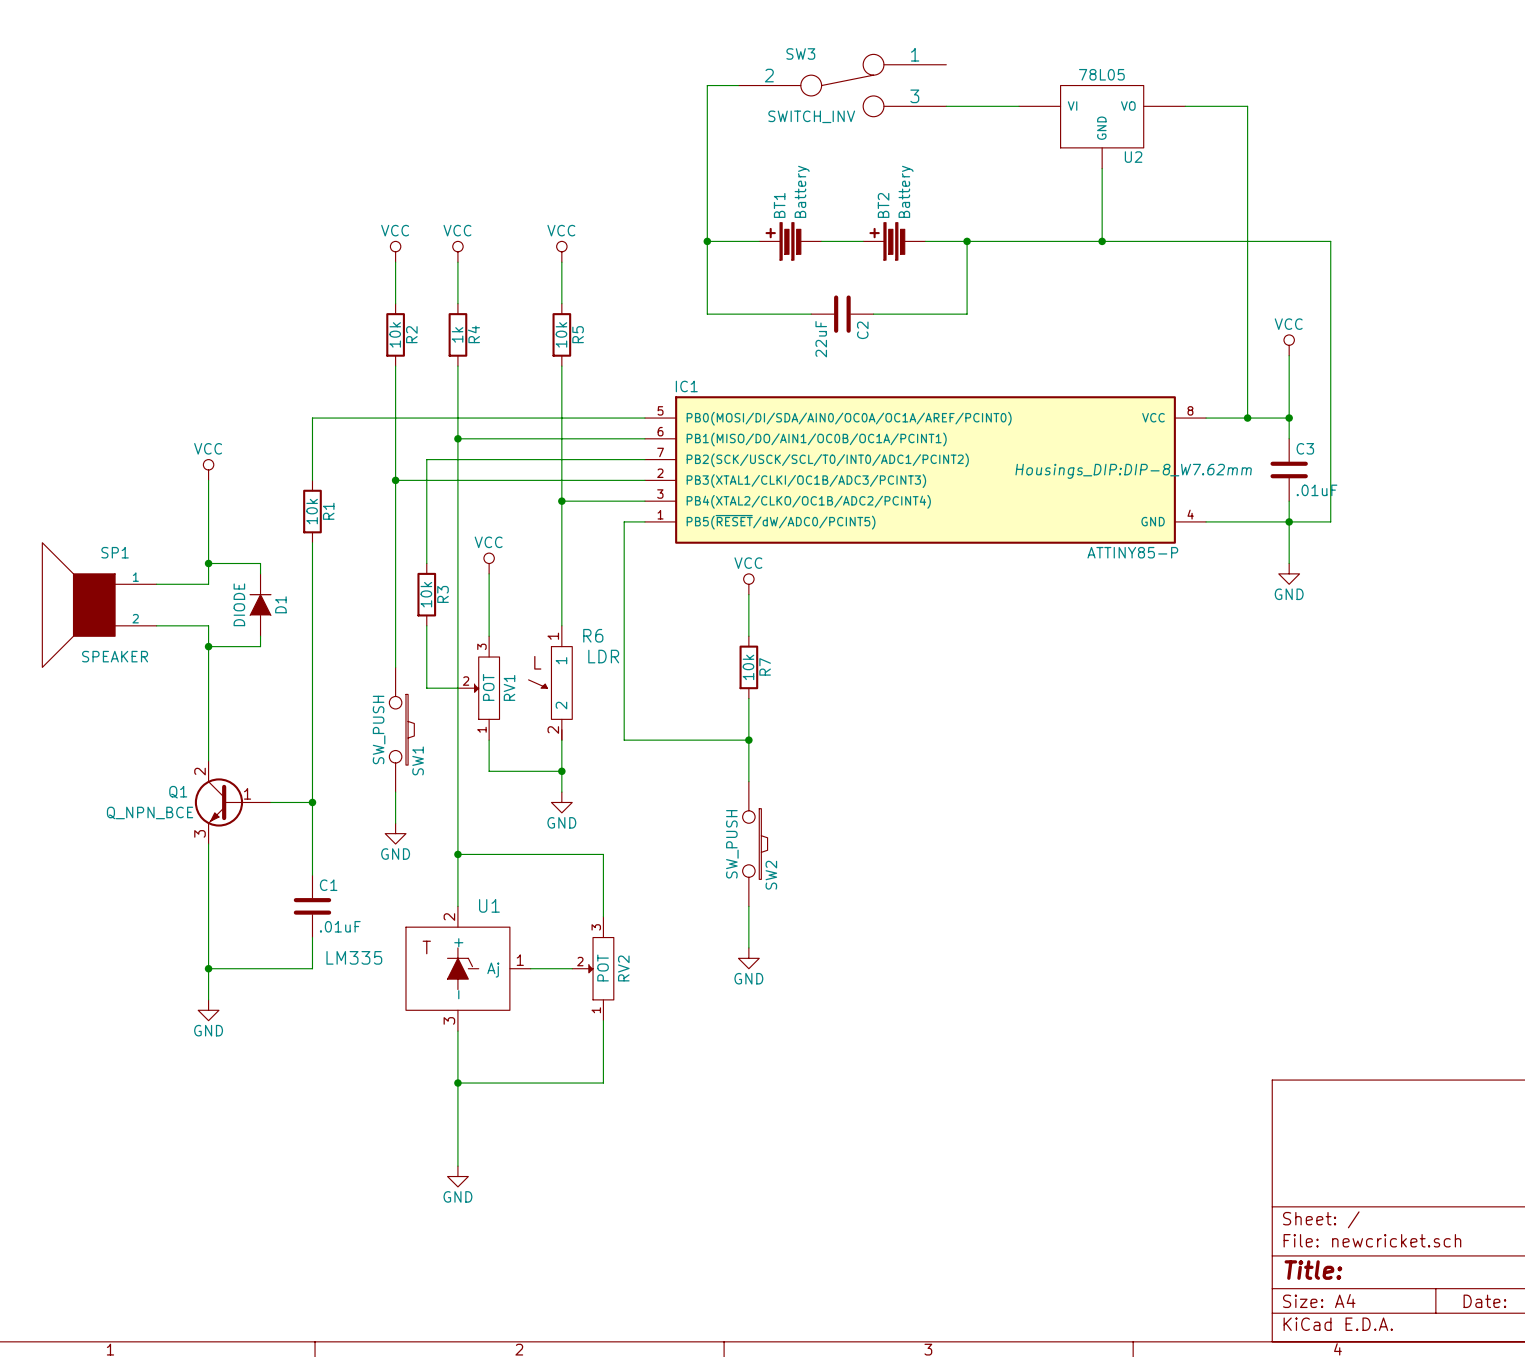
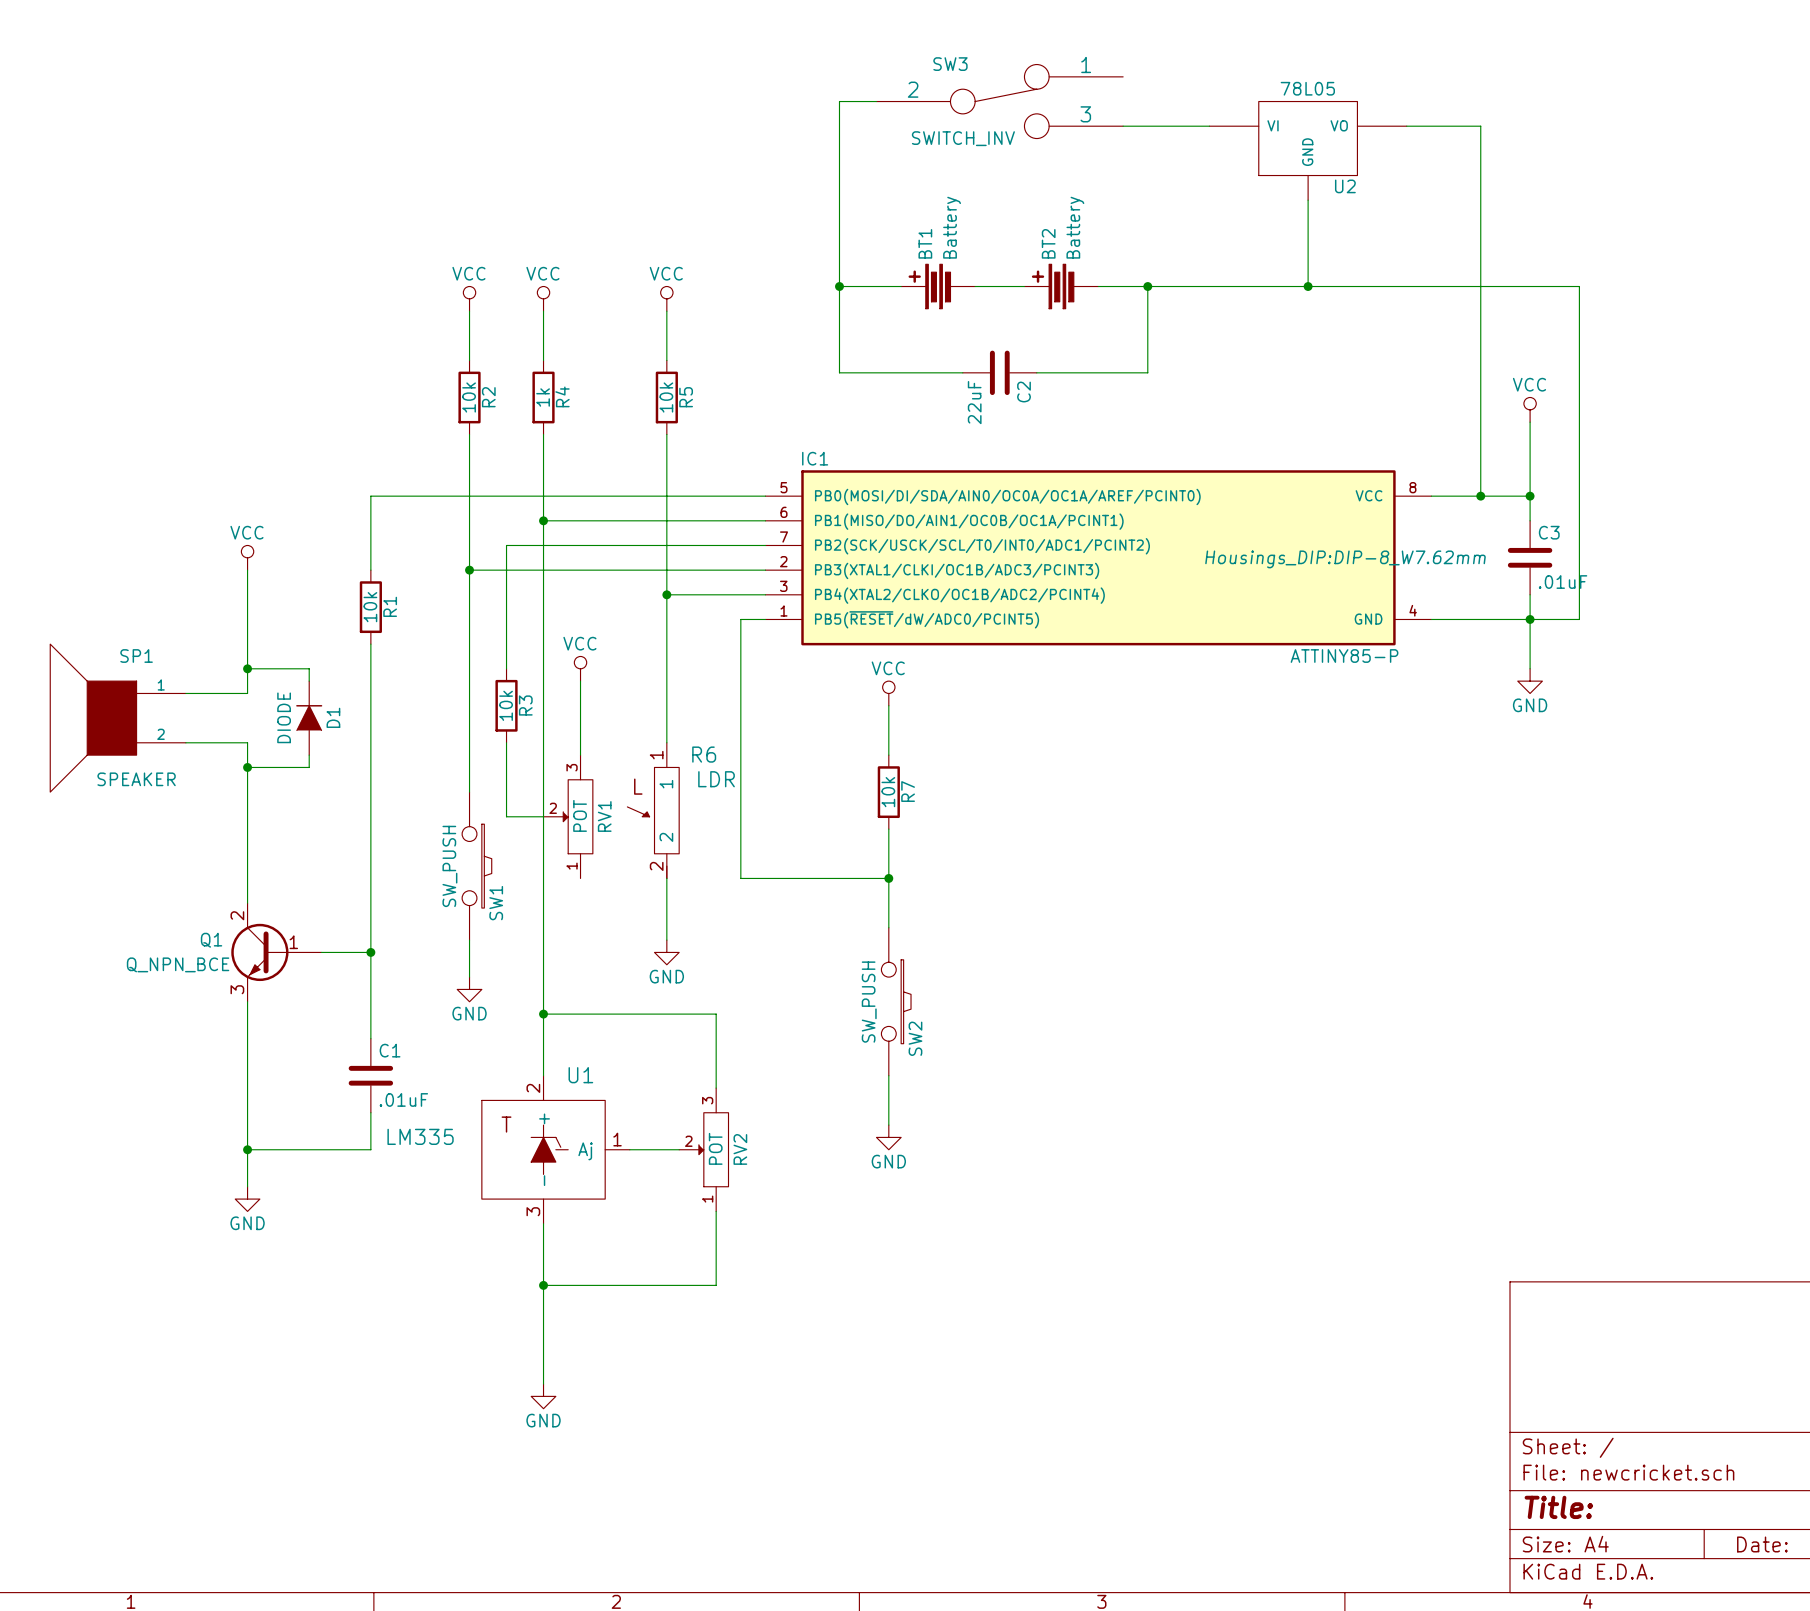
wire: (489, 740) (489, 771) (561, 771) -> none
junction: (561, 771) -> none

